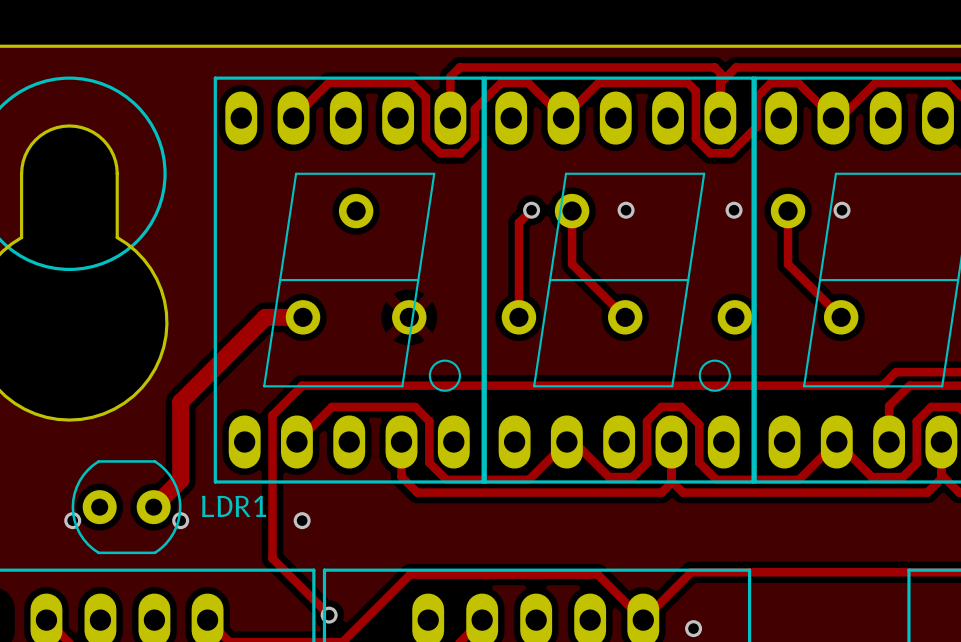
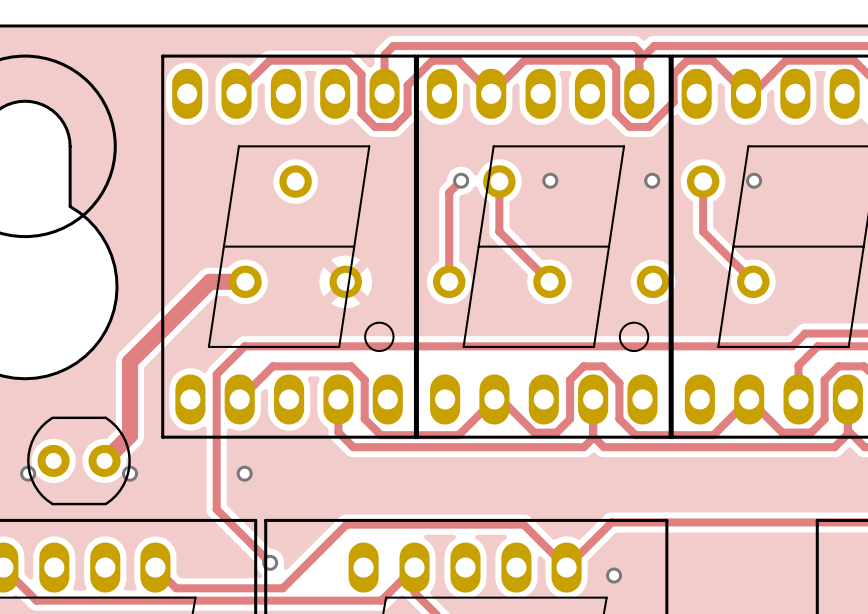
LDR1 name: LDR1 (234, 506) -> none

